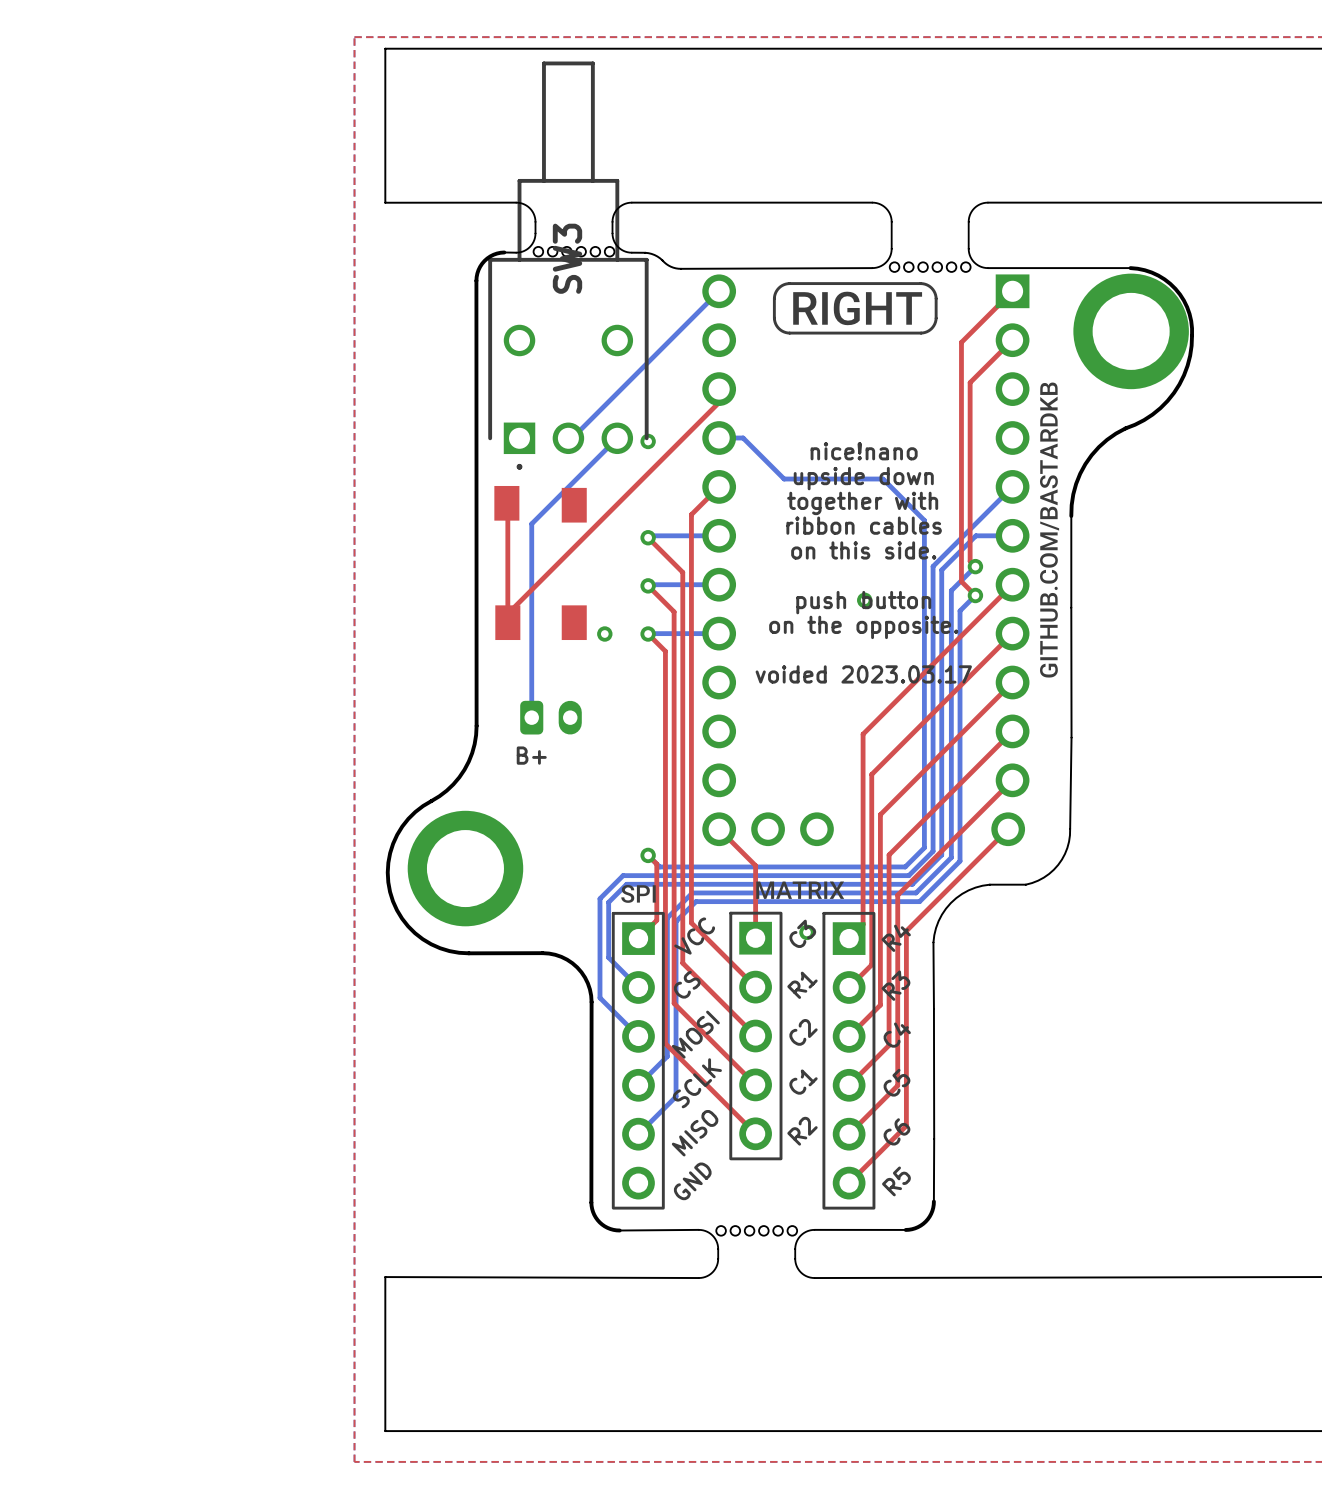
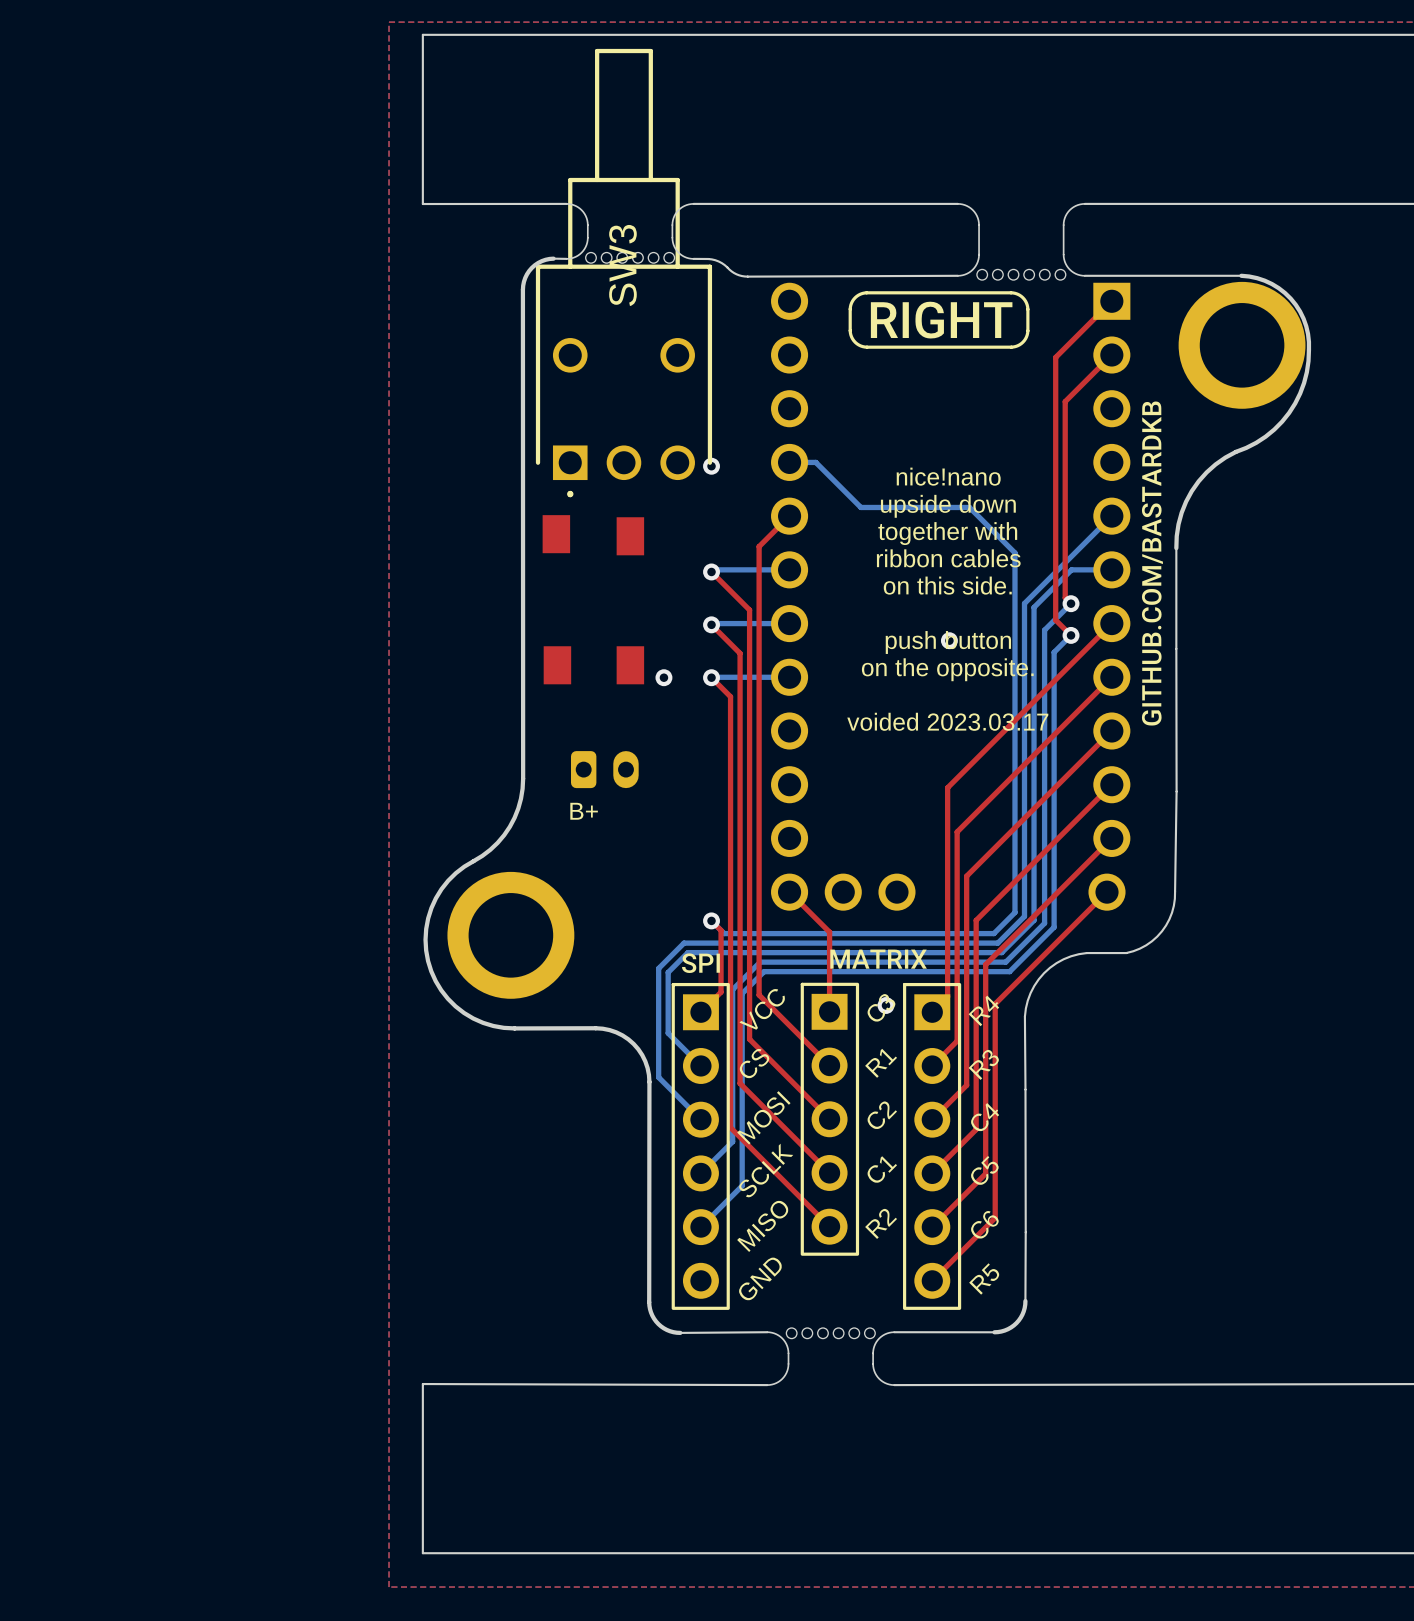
bottom track: (719, 291) (572, 438) (568, 438) -> none
top track: (719, 389) (719, 402) (507, 613) -> none
bottom track: (617, 438) (531, 523) (531, 717) -> none
top track: (506, 503) (509, 506) (507, 508) (507, 622) -> none

